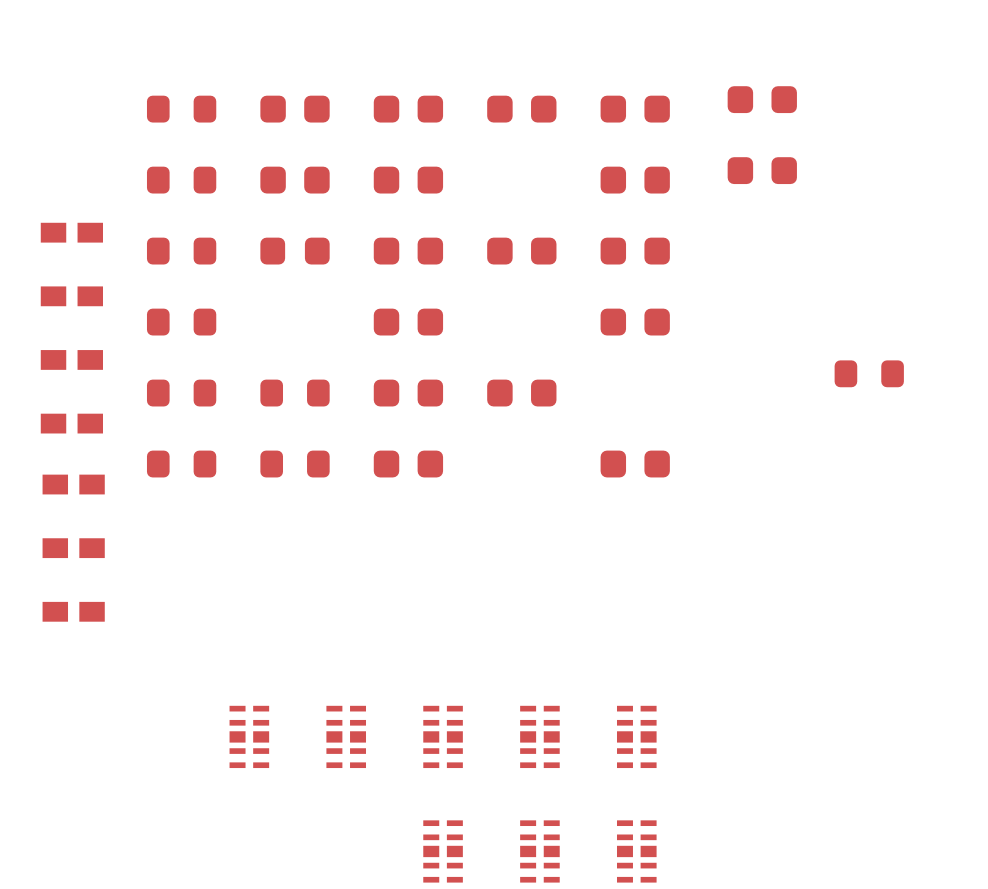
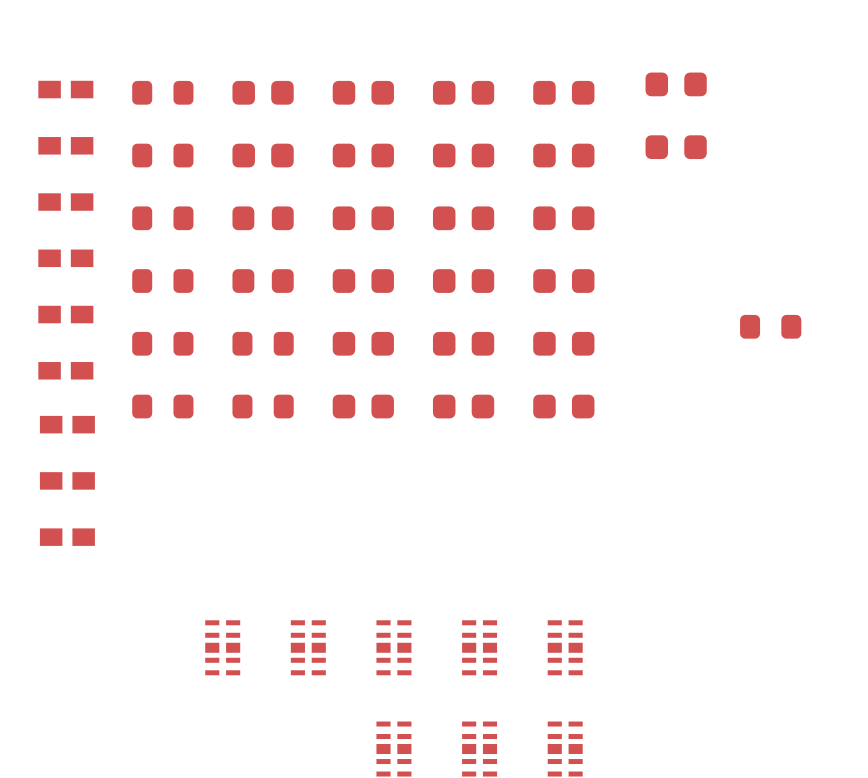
part: none -> (65, 89)
part: none -> (65, 145)
part: none -> (463, 155)
part: none -> (263, 281)
part: none -> (463, 281)
part: none -> (563, 343)
part: none -> (463, 406)

